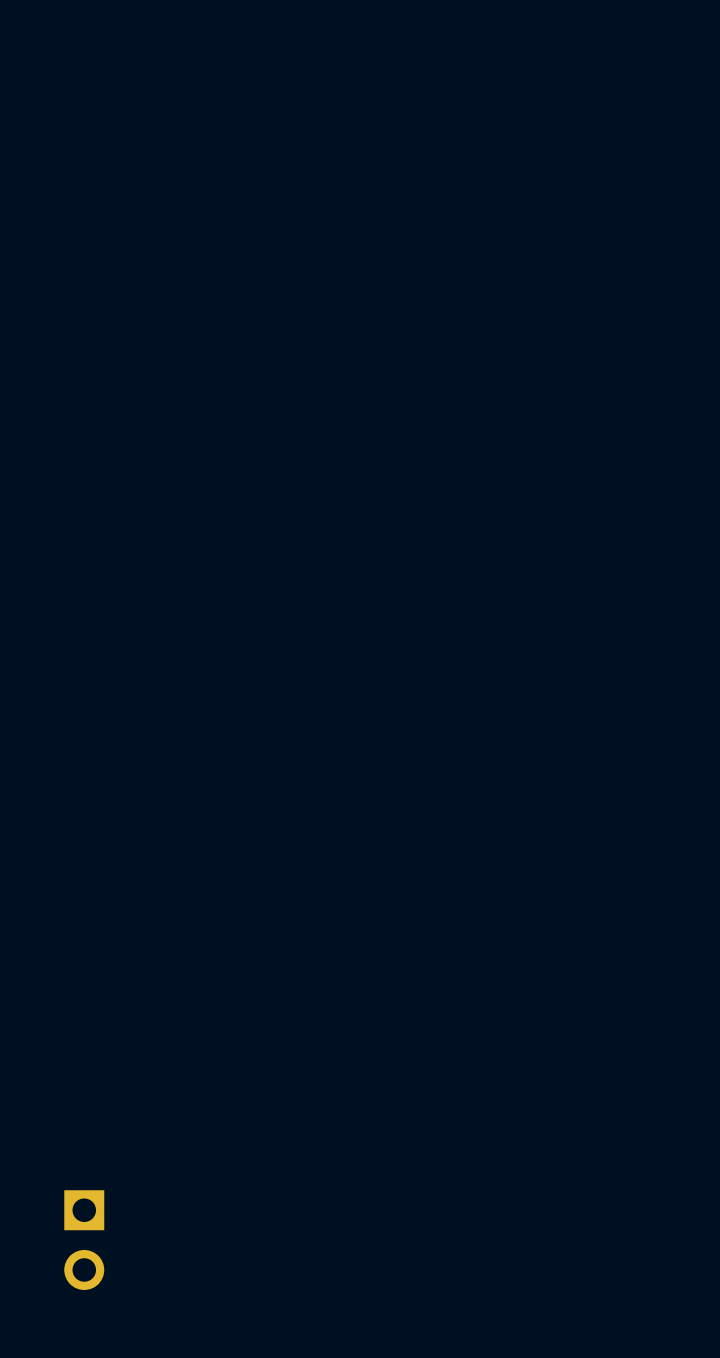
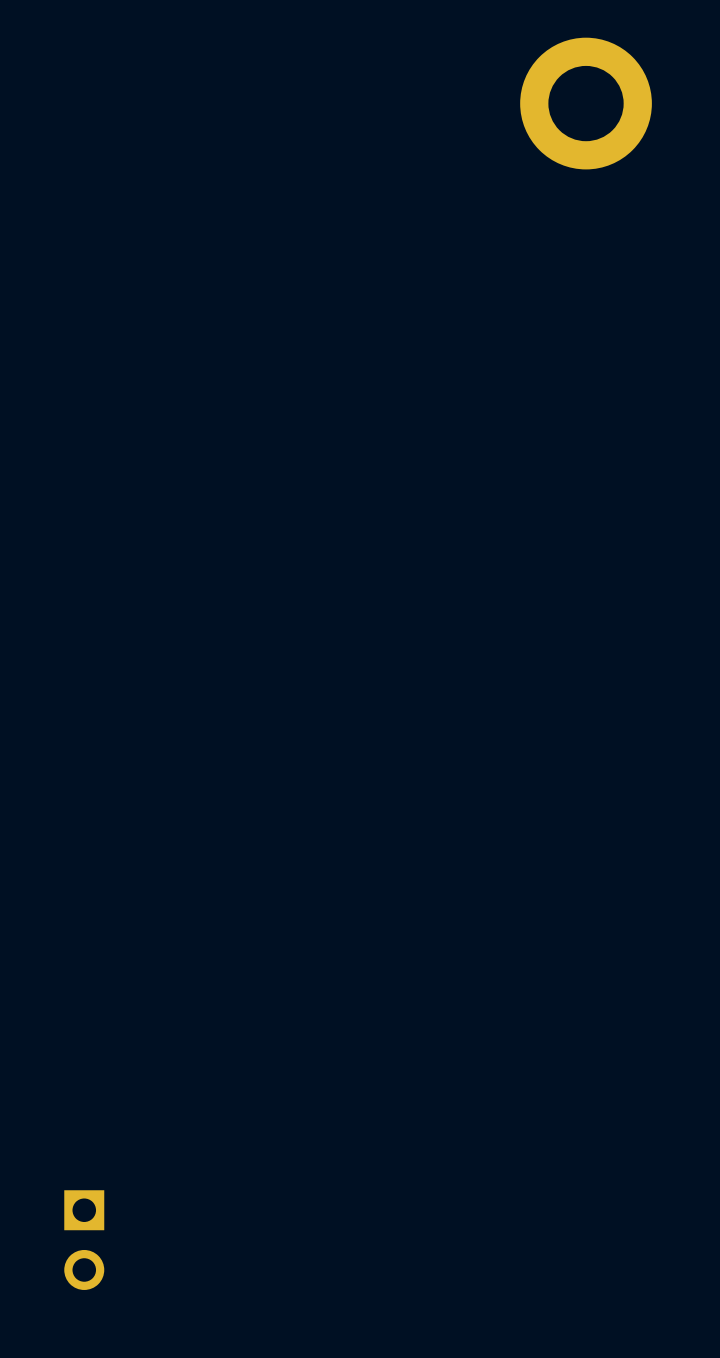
part: none -> (586, 103)

